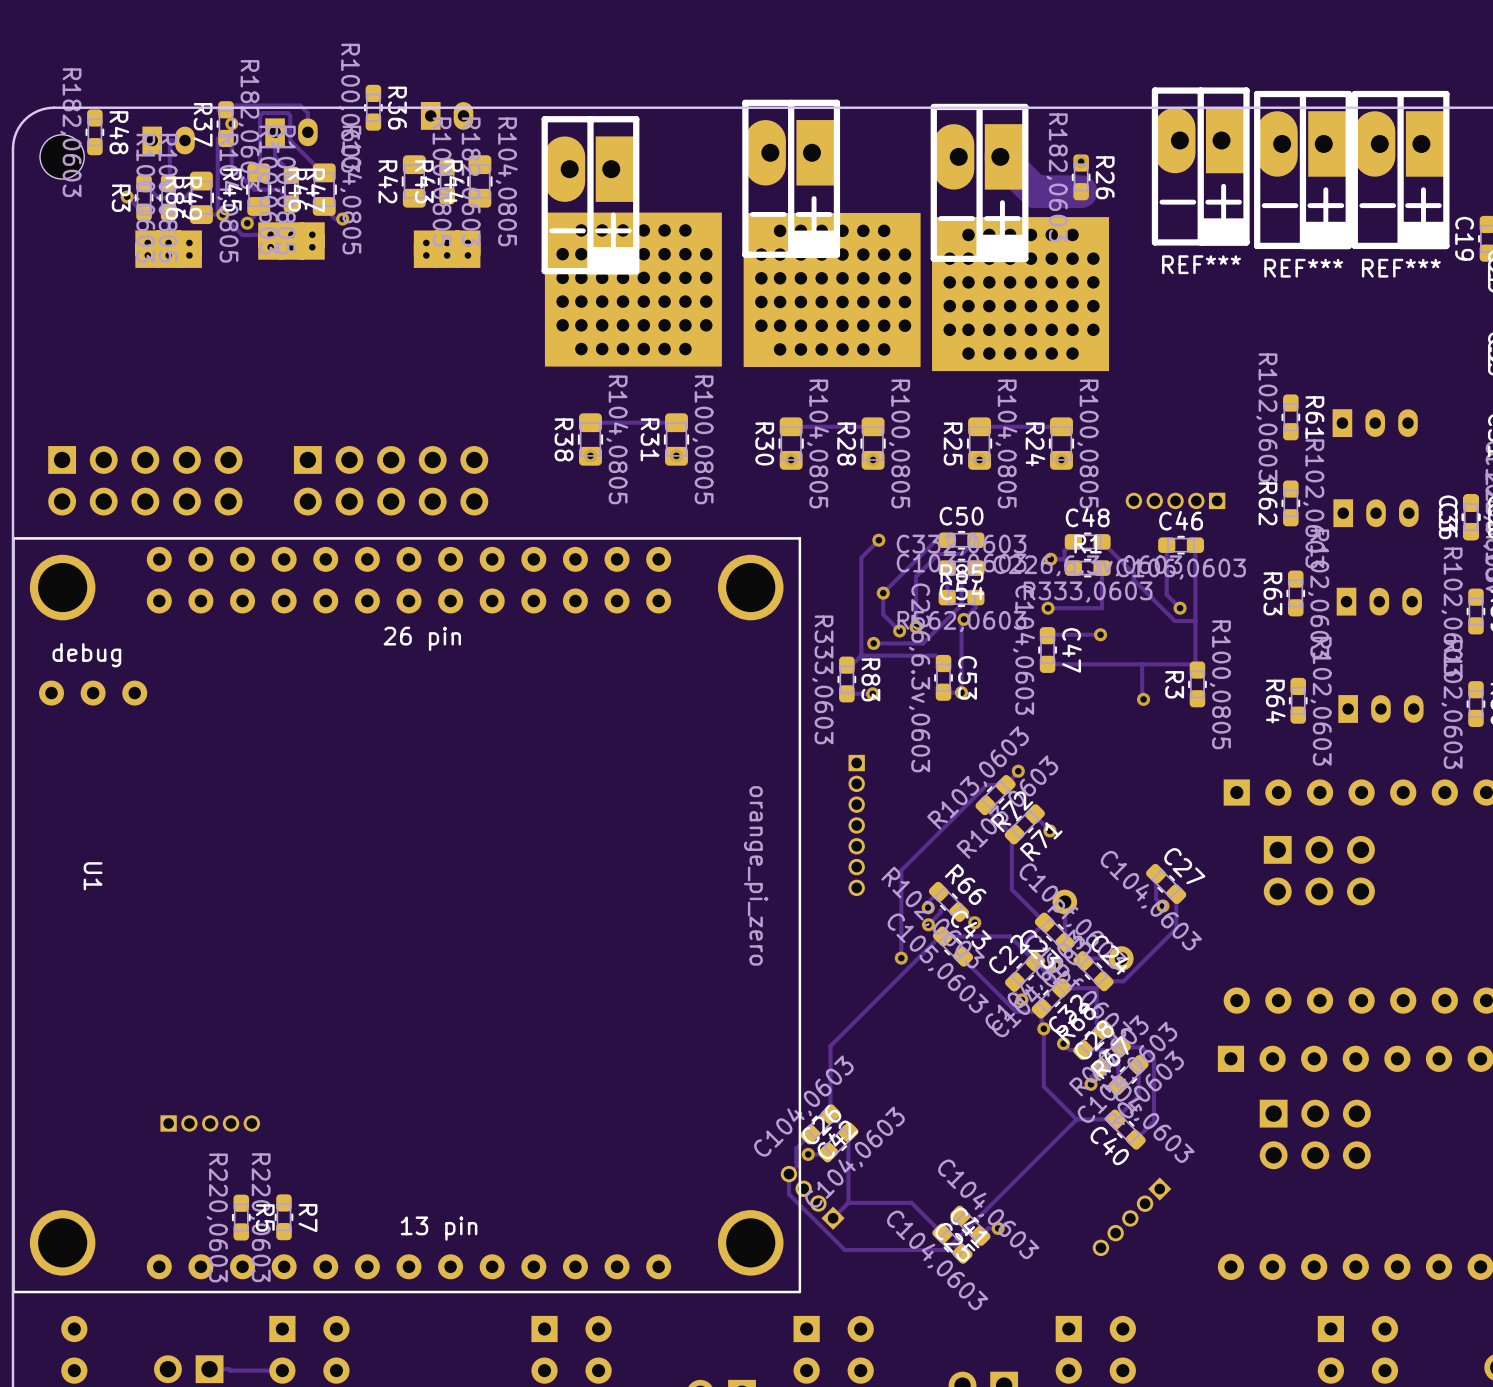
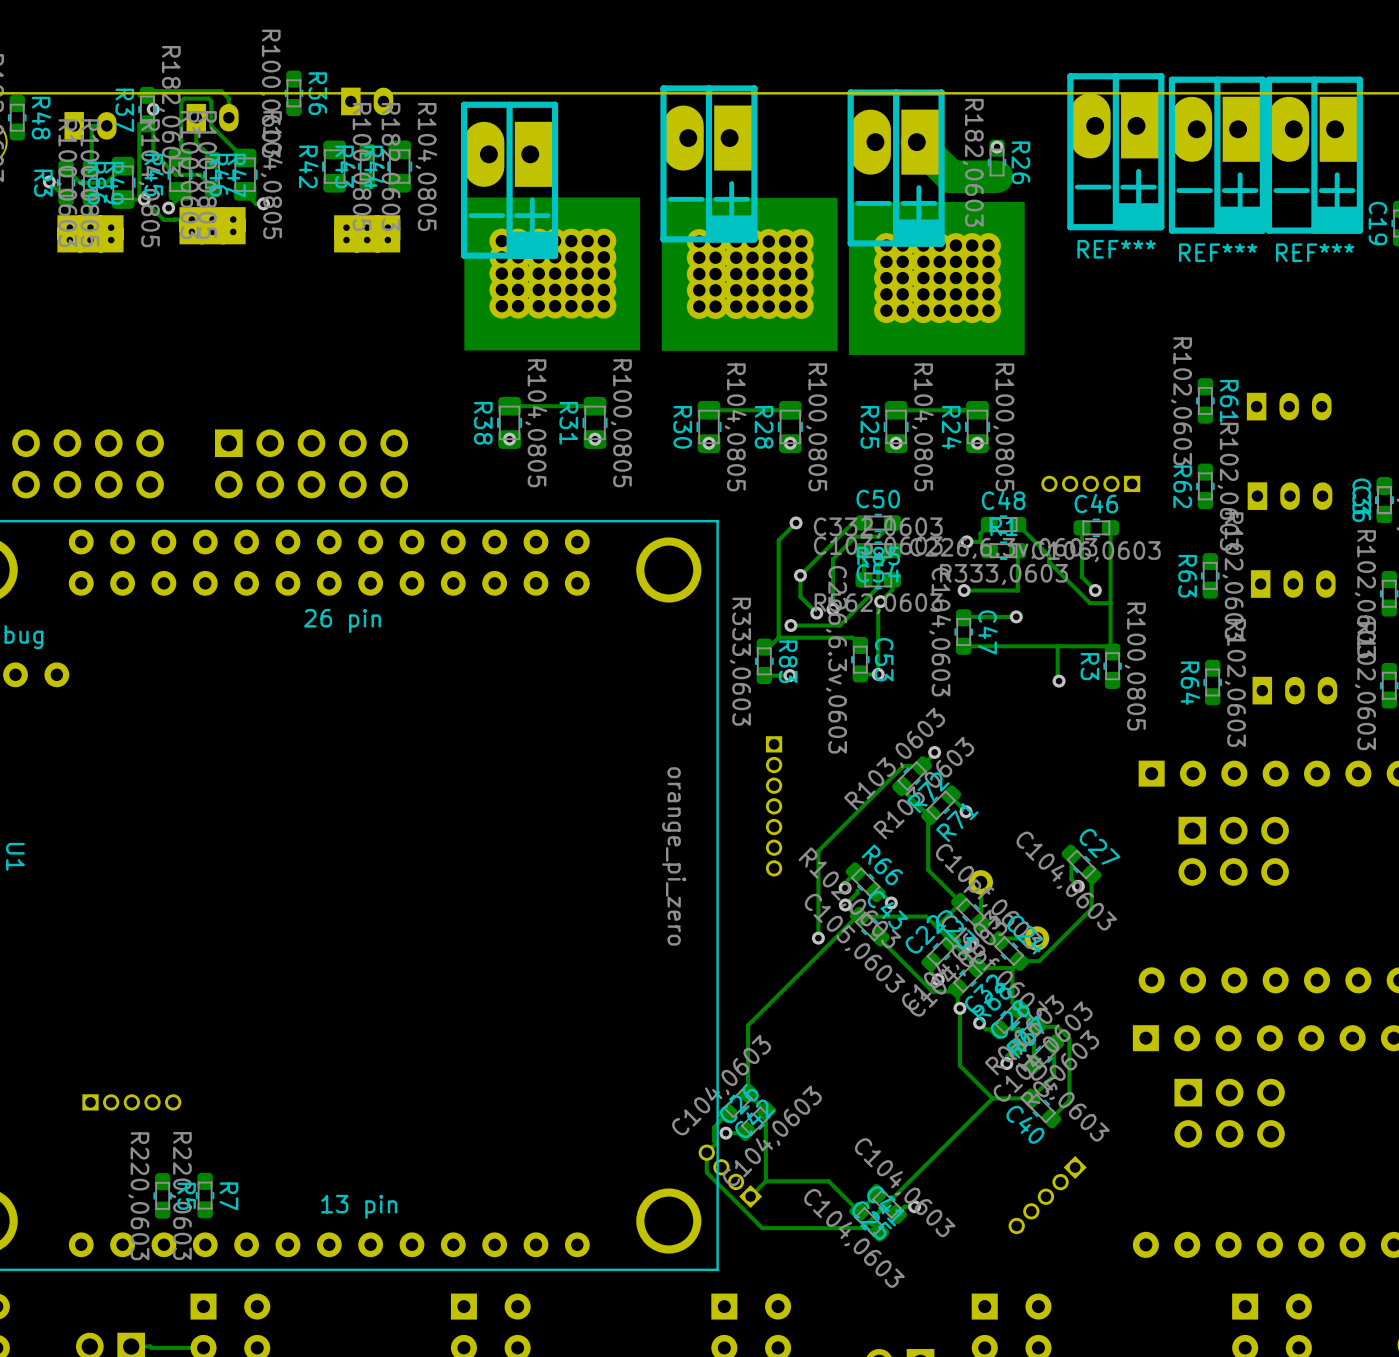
part footprint: [544, 212, 722, 367] -> [464, 197, 641, 351]
part footprint: [743, 212, 921, 367] -> [661, 197, 838, 351]
part footprint: [932, 217, 1109, 372] -> [848, 201, 1025, 355]

